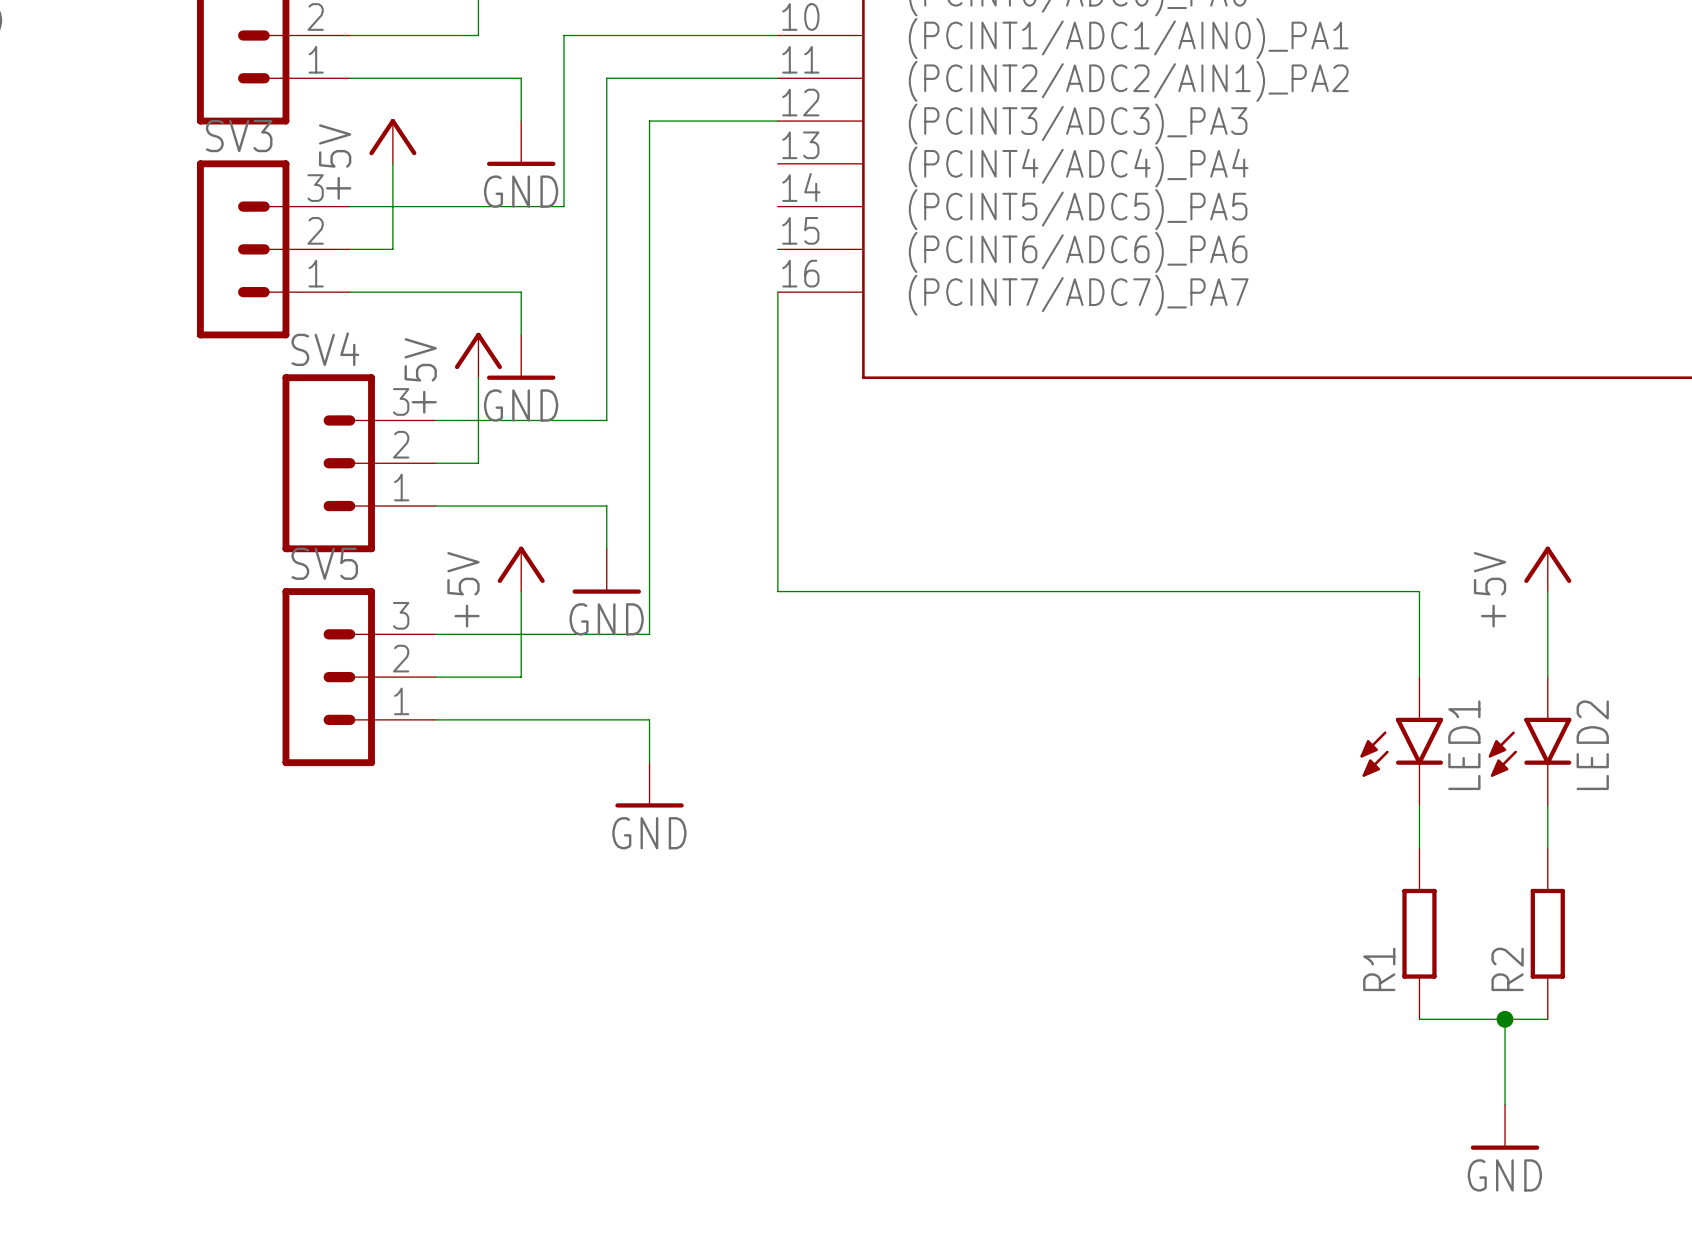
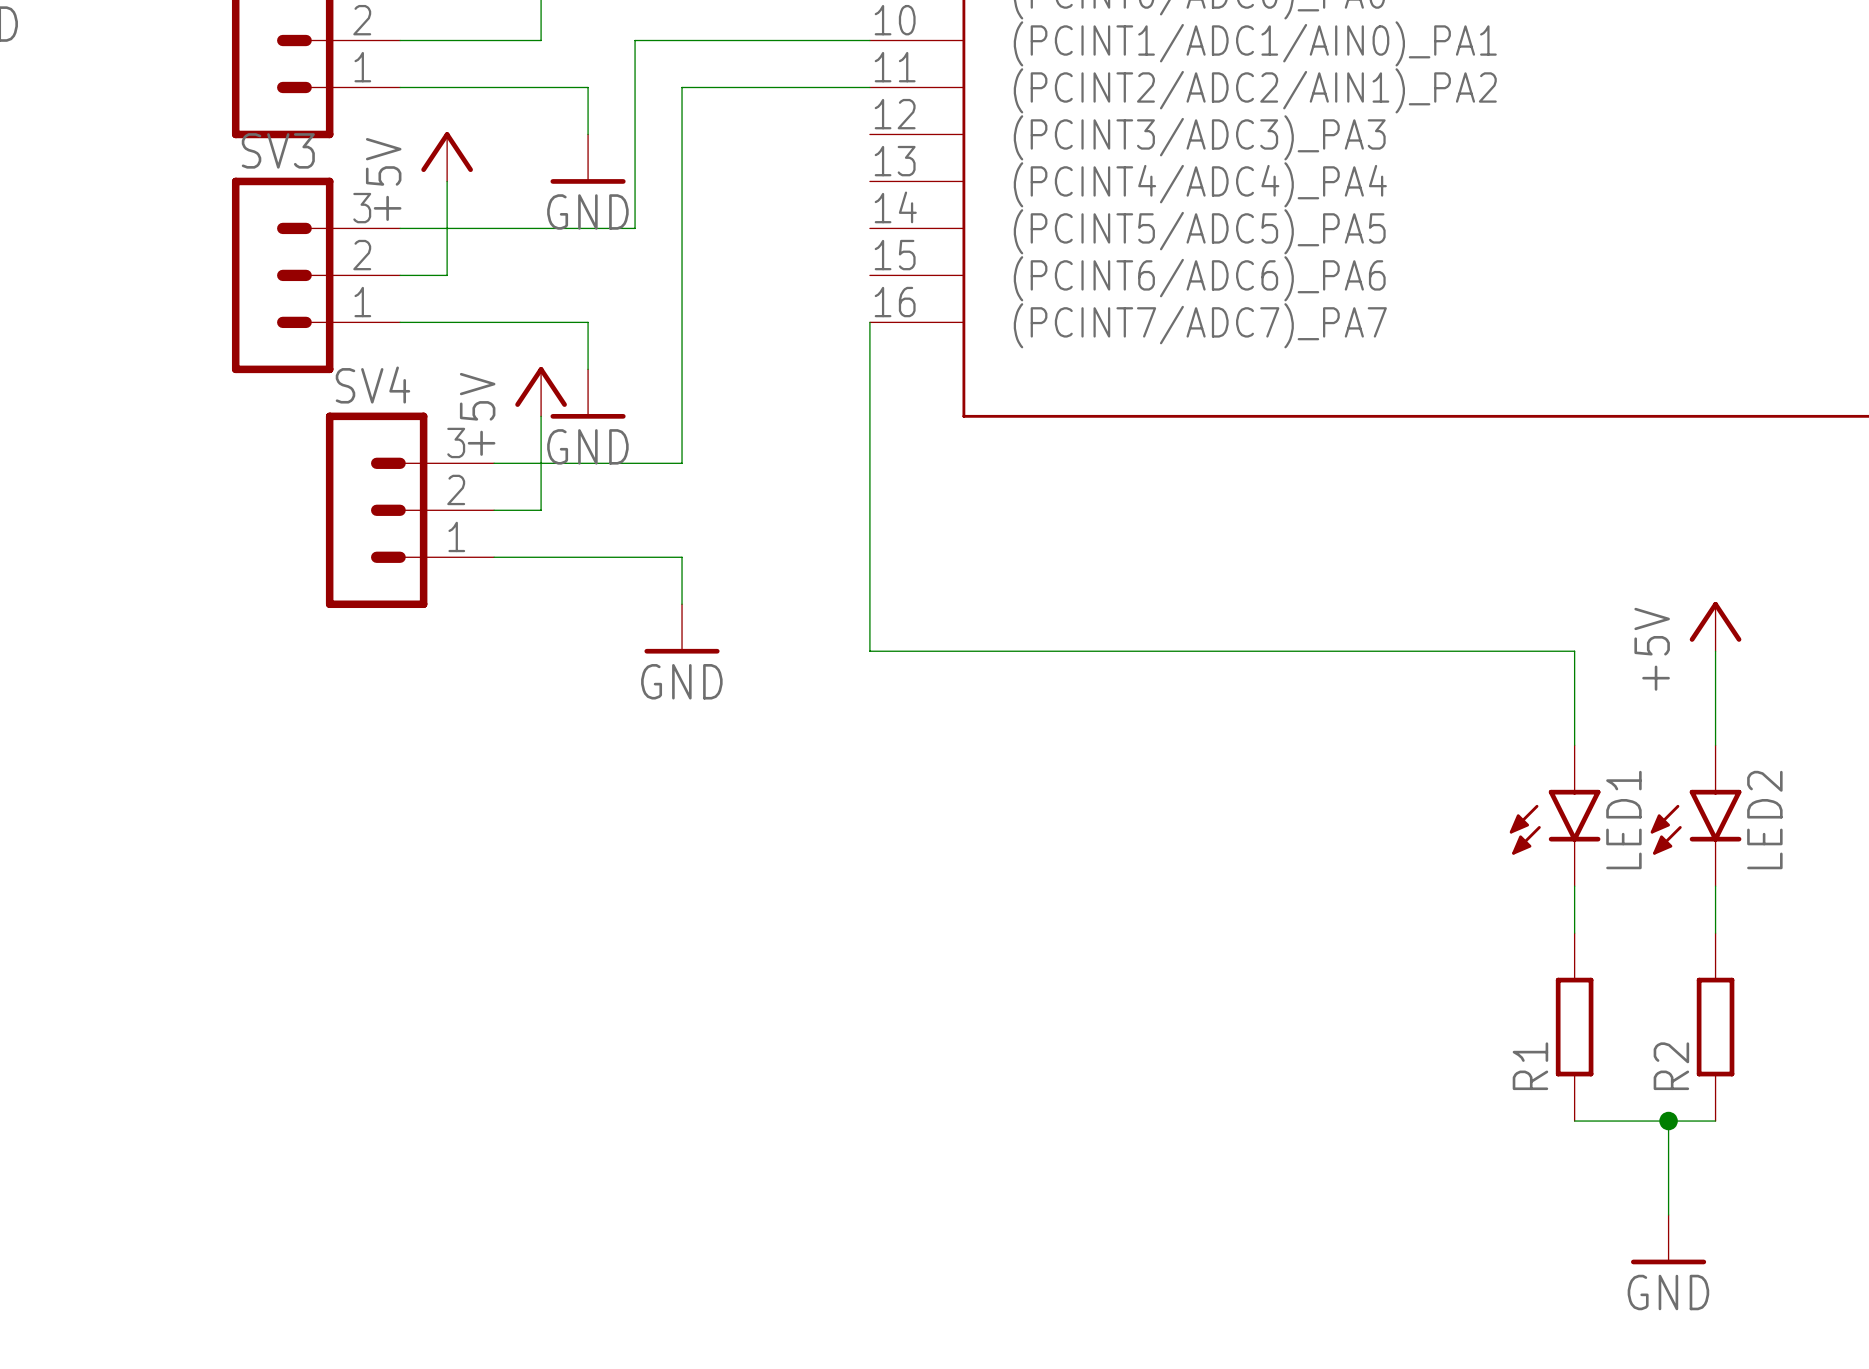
wire: (777, 121) (649, 121) (649, 634) (435, 634) -> none
power symbol: +5V (521, 569) -> none
wire: (521, 591) (521, 677) (435, 677) -> none
SV5: (359, 677) -> none
wire: (435, 719) (649, 719) (649, 762) -> none
power symbol: GND (649, 785) -> none

